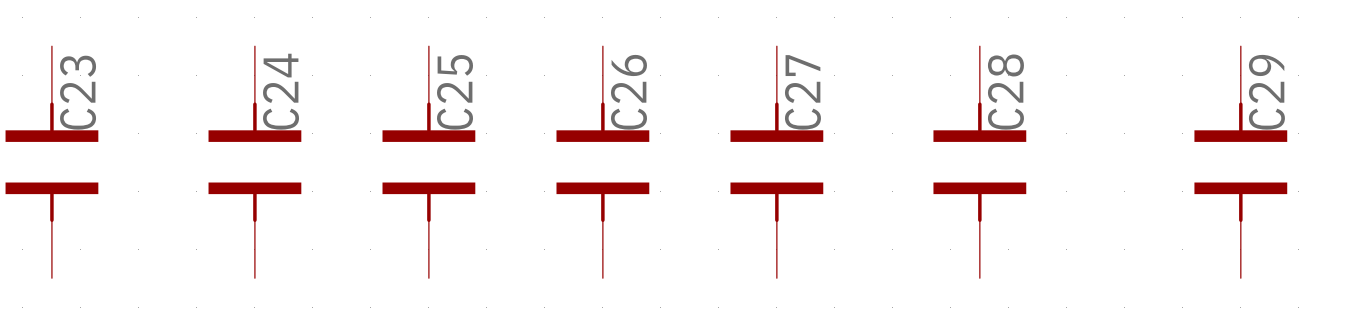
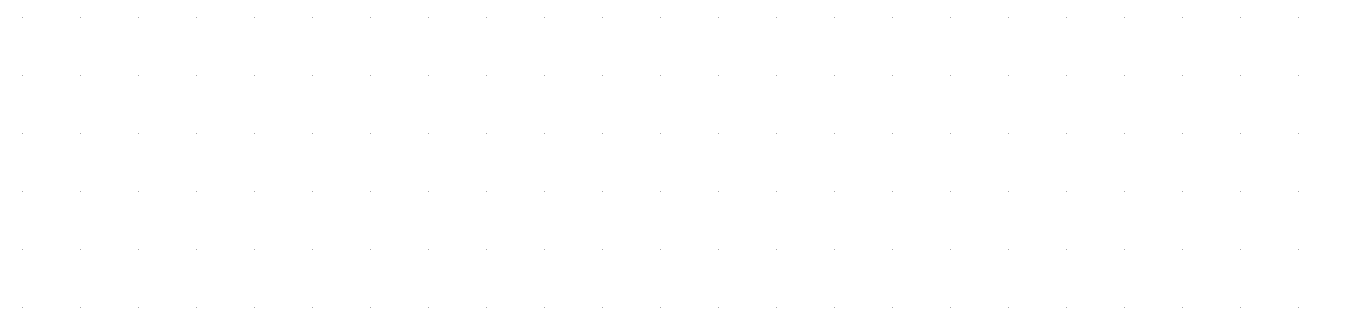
C23: (51, 162) -> none
C24: (254, 162) -> none
C25: (428, 162) -> none
C26: (602, 162) -> none
C27: (776, 162) -> none
C28: (979, 162) -> none
C29: (1240, 162) -> none

